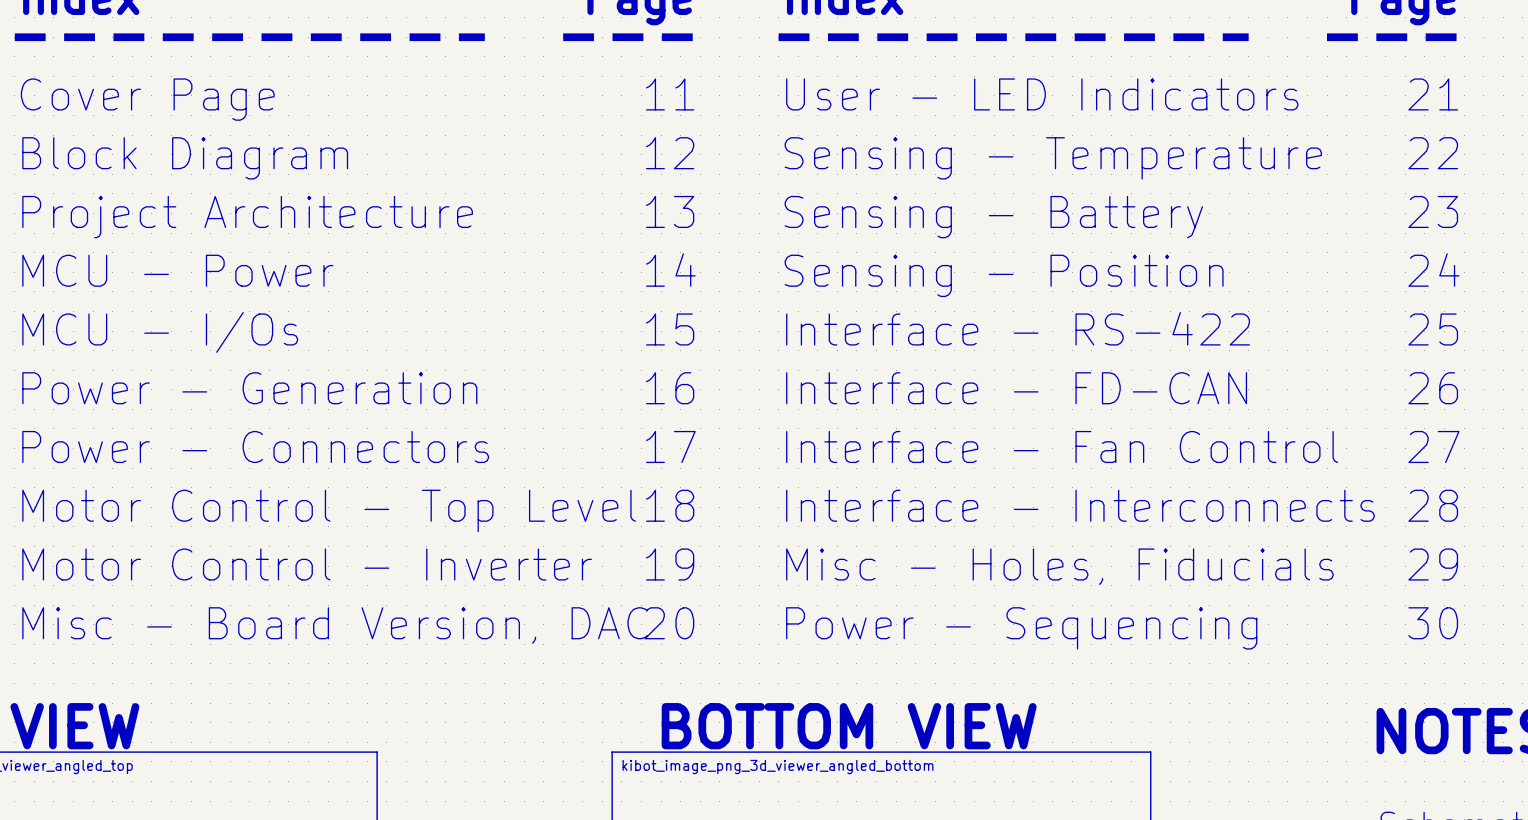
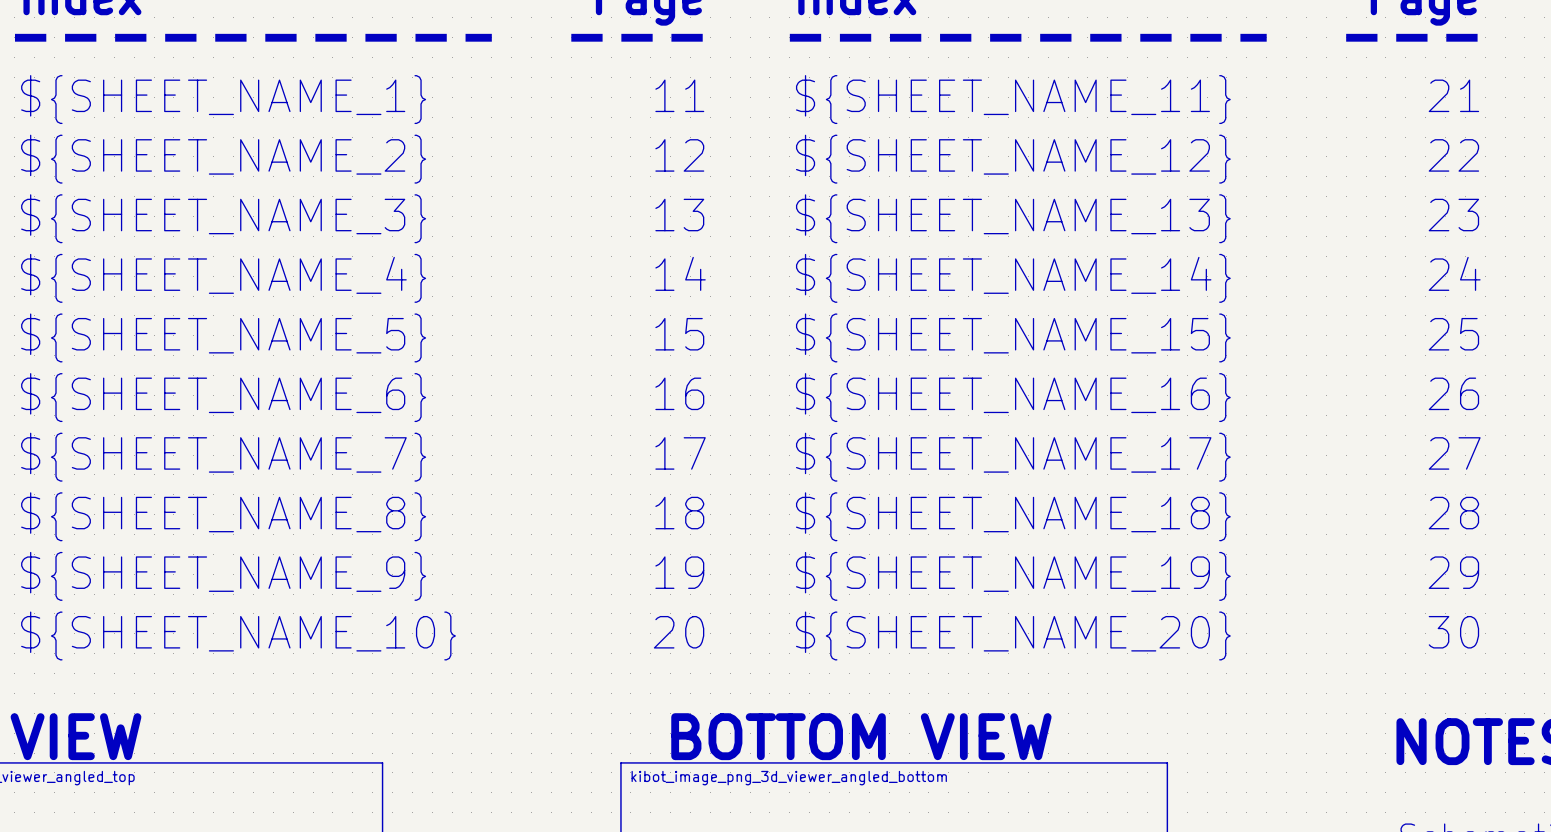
text: User - LED Indicators (1042, 94) -> ${SHEET_NAME_11} (1013, 99)
text: Cover Page (147, 99) -> ${SHEET_NAME_1} (223, 99)
text: Block Diagram (185, 158) -> ${SHEET_NAME_2} (223, 159)
text: Sensing - Temperature (1053, 158) -> ${SHEET_NAME_12} (1013, 159)
text: Project Architecture (247, 217) -> ${SHEET_NAME_3} (223, 218)
text: Sensing - Battery (993, 217) -> ${SHEET_NAME_13} (1013, 218)
text: MCU - Power (177, 270) -> ${SHEET_NAME_4} (223, 278)
text: Sensing - Position (1004, 275) -> ${SHEET_NAME_14} (1013, 278)
text: Interface - RS-422 (1018, 328) -> ${SHEET_NAME_15} (1013, 337)
text: MCU - I/Os (160, 332) -> ${SHEET_NAME_5} (223, 337)
text: Power - Generation (249, 388) -> ${SHEET_NAME_6} (223, 397)
text: Interface - FD-CAN (1016, 388) -> ${SHEET_NAME_16} (1013, 397)
text: Power - Connectors (255, 446) -> ${SHEET_NAME_7} (223, 457)
text: Interface - Fan Control (1062, 446) -> ${SHEET_NAME_17} (1013, 457)
text: Interface - Interconnects (1080, 505) -> ${SHEET_NAME_18} (1013, 516)
text: Motor Control - Top Level (329, 510) -> ${SHEET_NAME_8} (223, 516)
text: Motor Control - Inverter (307, 564) -> ${SHEET_NAME_9} (223, 576)
text: Misc - Holes, Fiducials (1059, 566) -> ${SHEET_NAME_19} (1013, 576)
text: Misc - Board Version, DAC (335, 625) -> ${SHEET_NAME_10} (238, 635)
text: Power - Sequencing (1021, 628) -> ${SHEET_NAME_20} (1013, 635)

